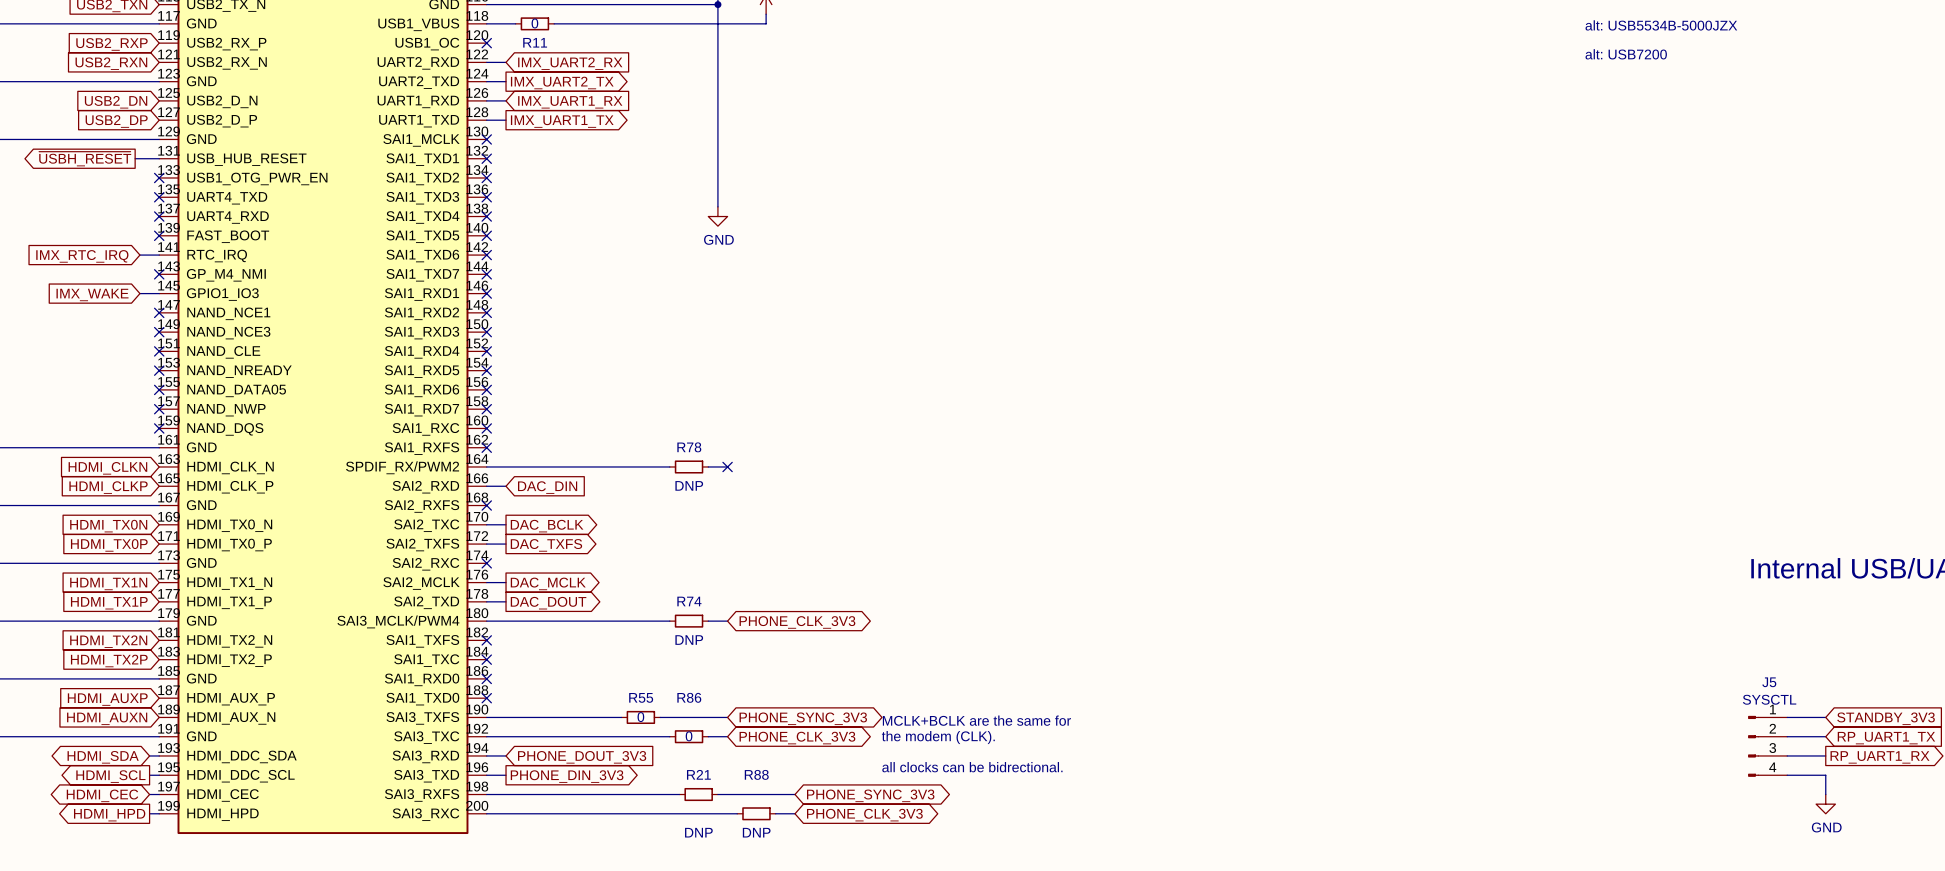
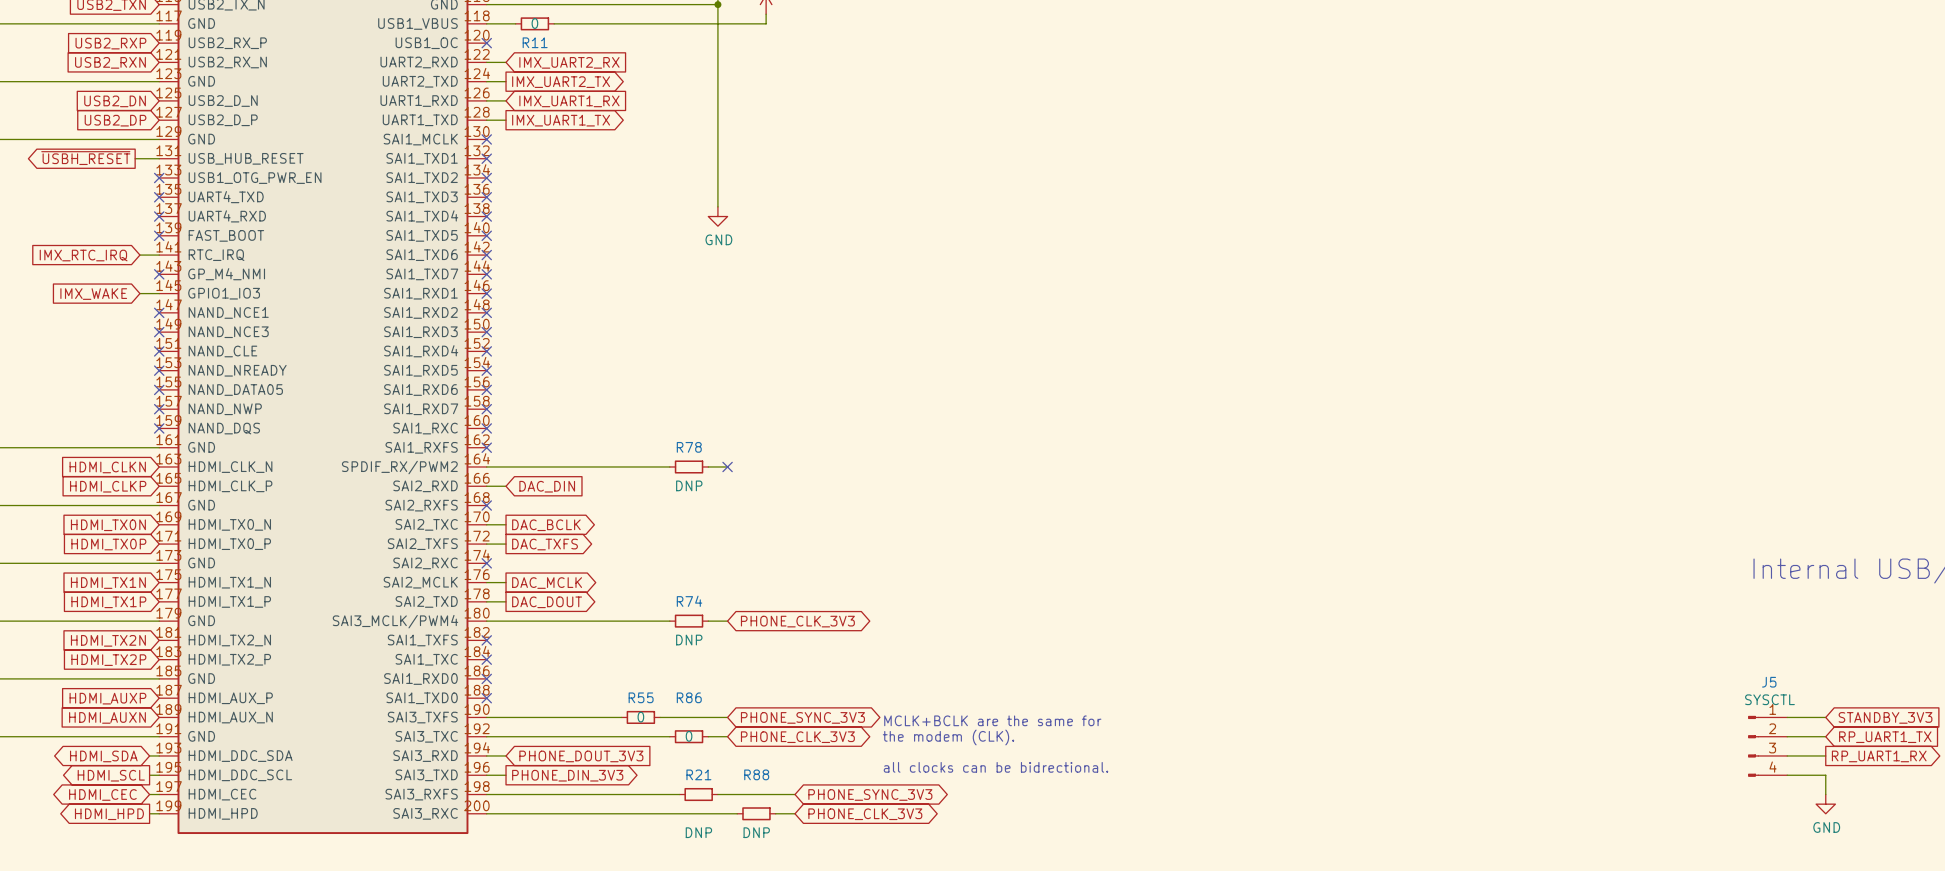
text: alt: USB5534B-5000JZX (1661, 25) -> none
text: alt: USB7200 (1626, 54) -> none

